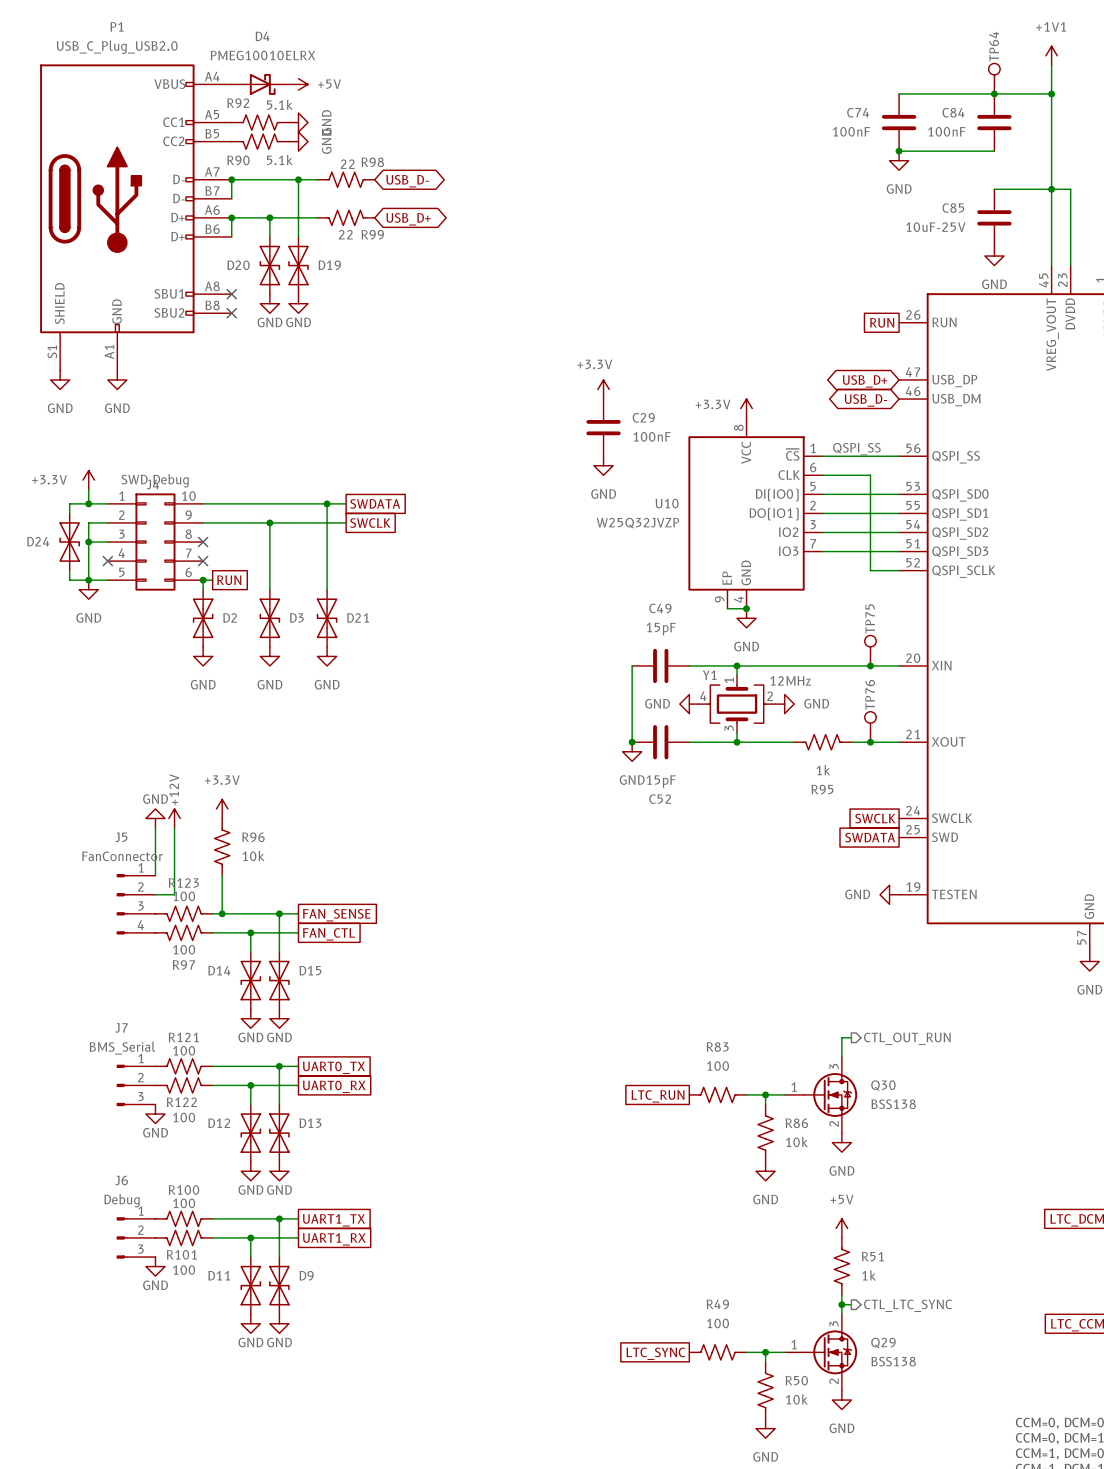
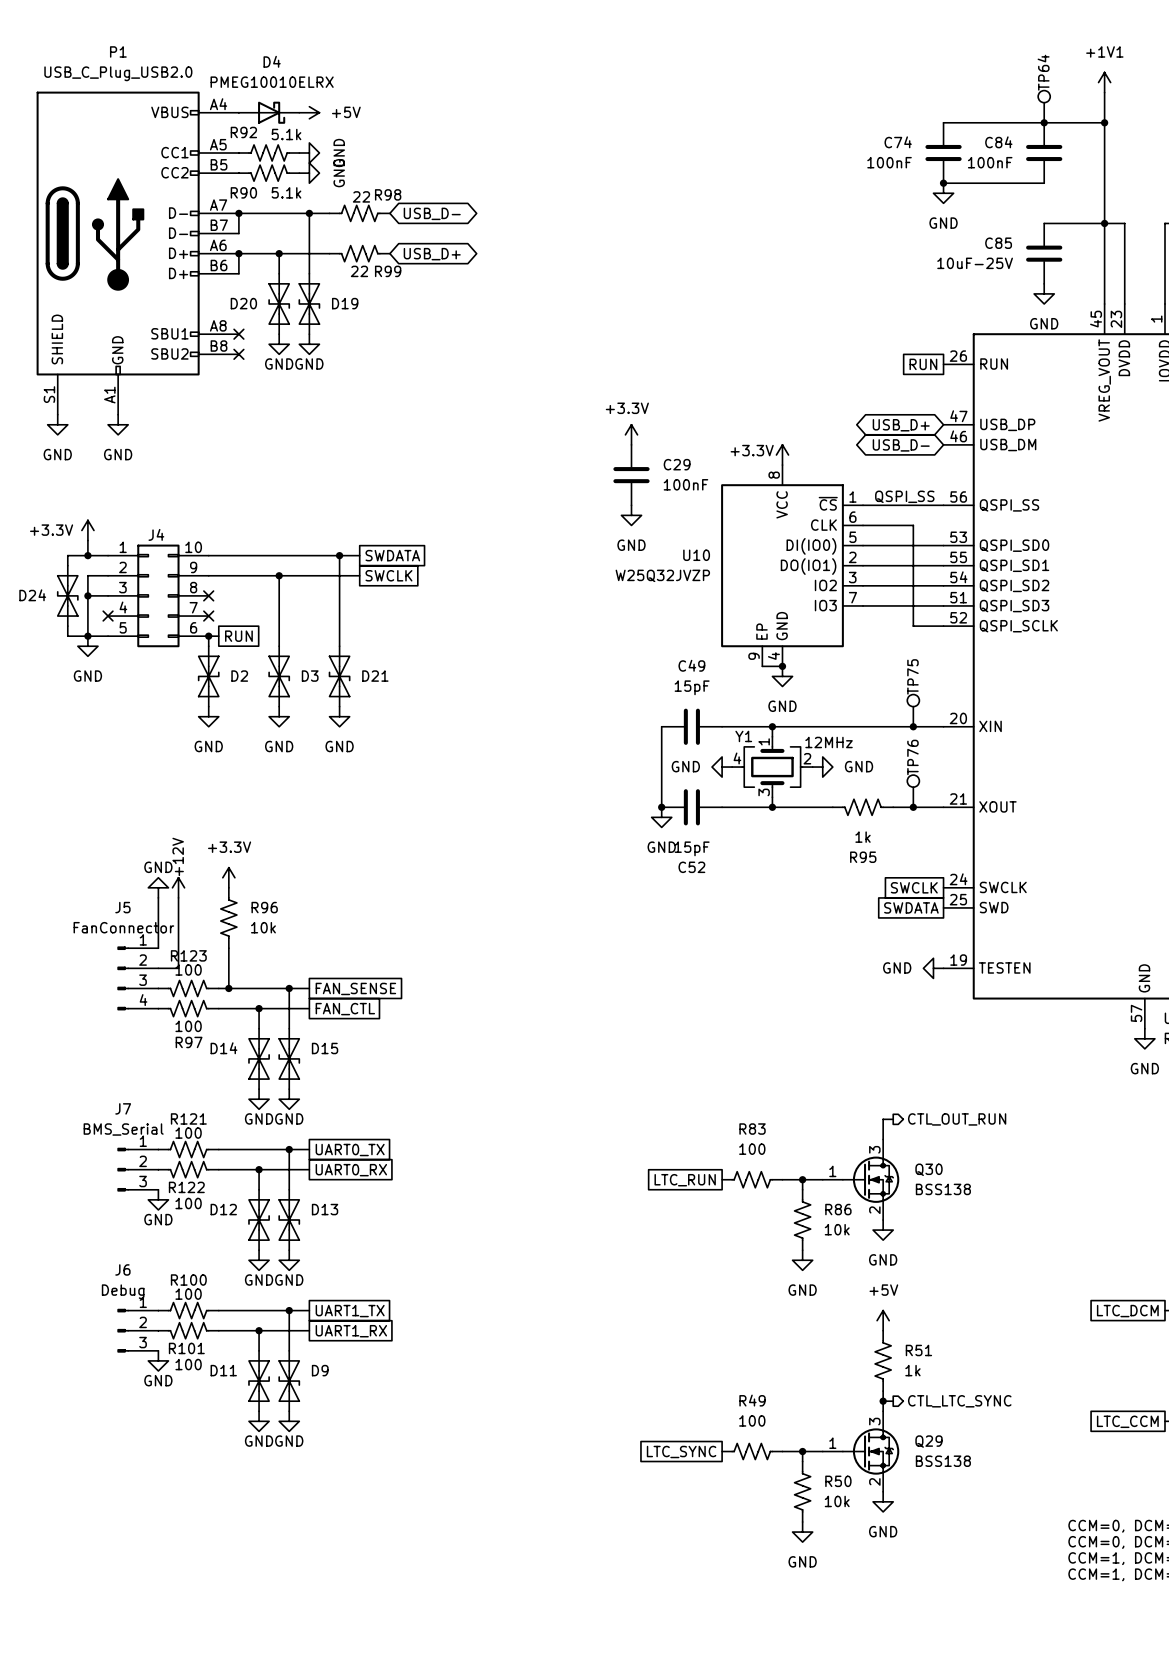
J4 value: SWD Debug (155, 480) -> none

